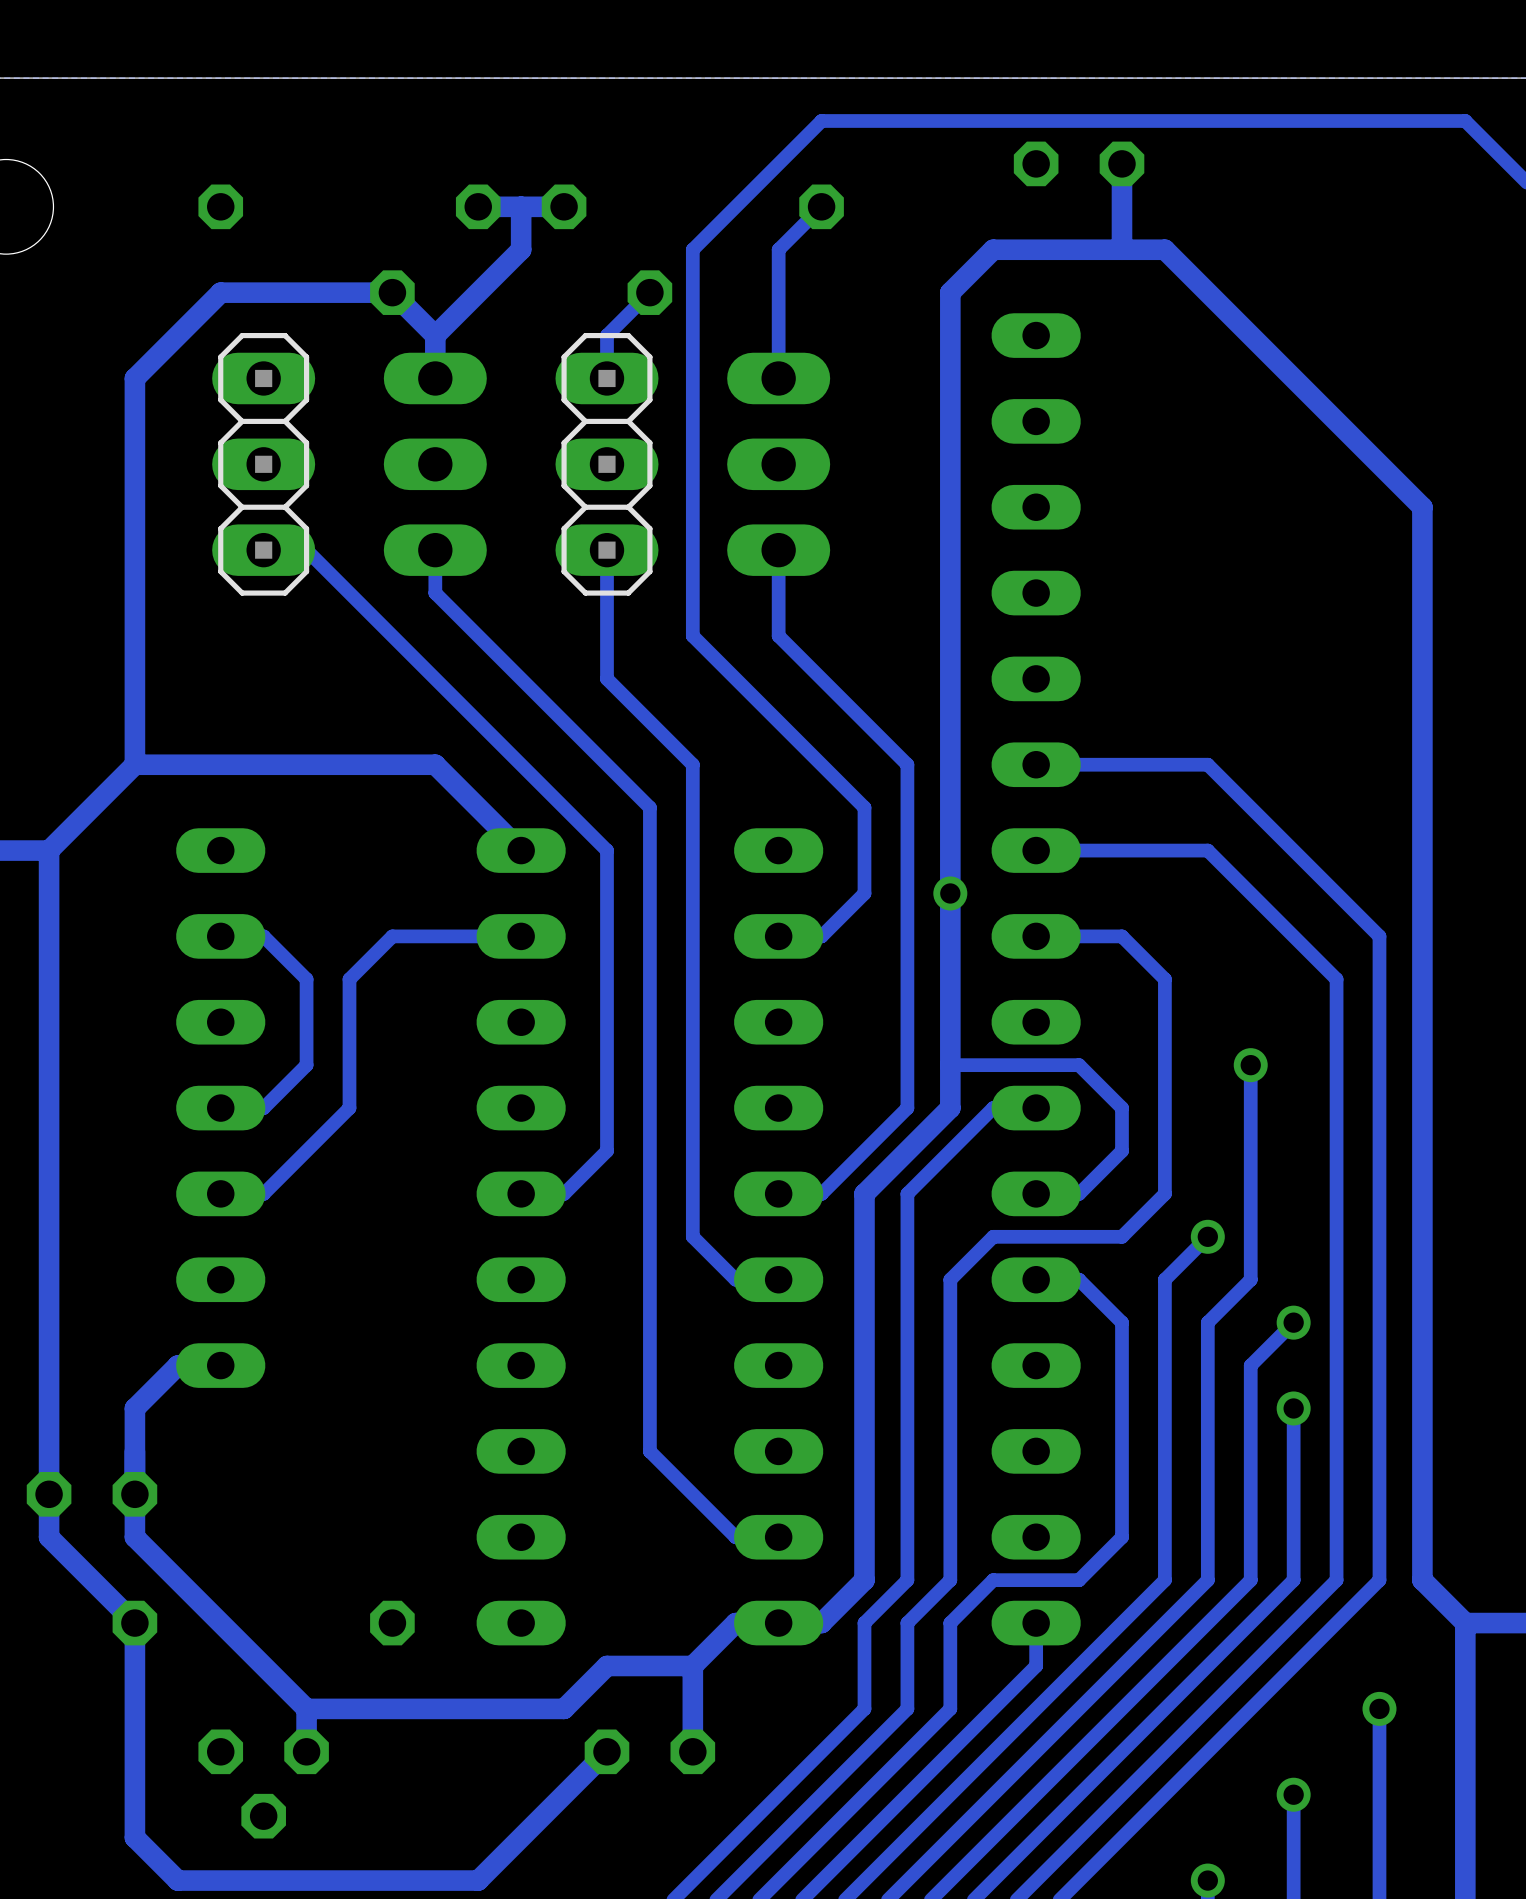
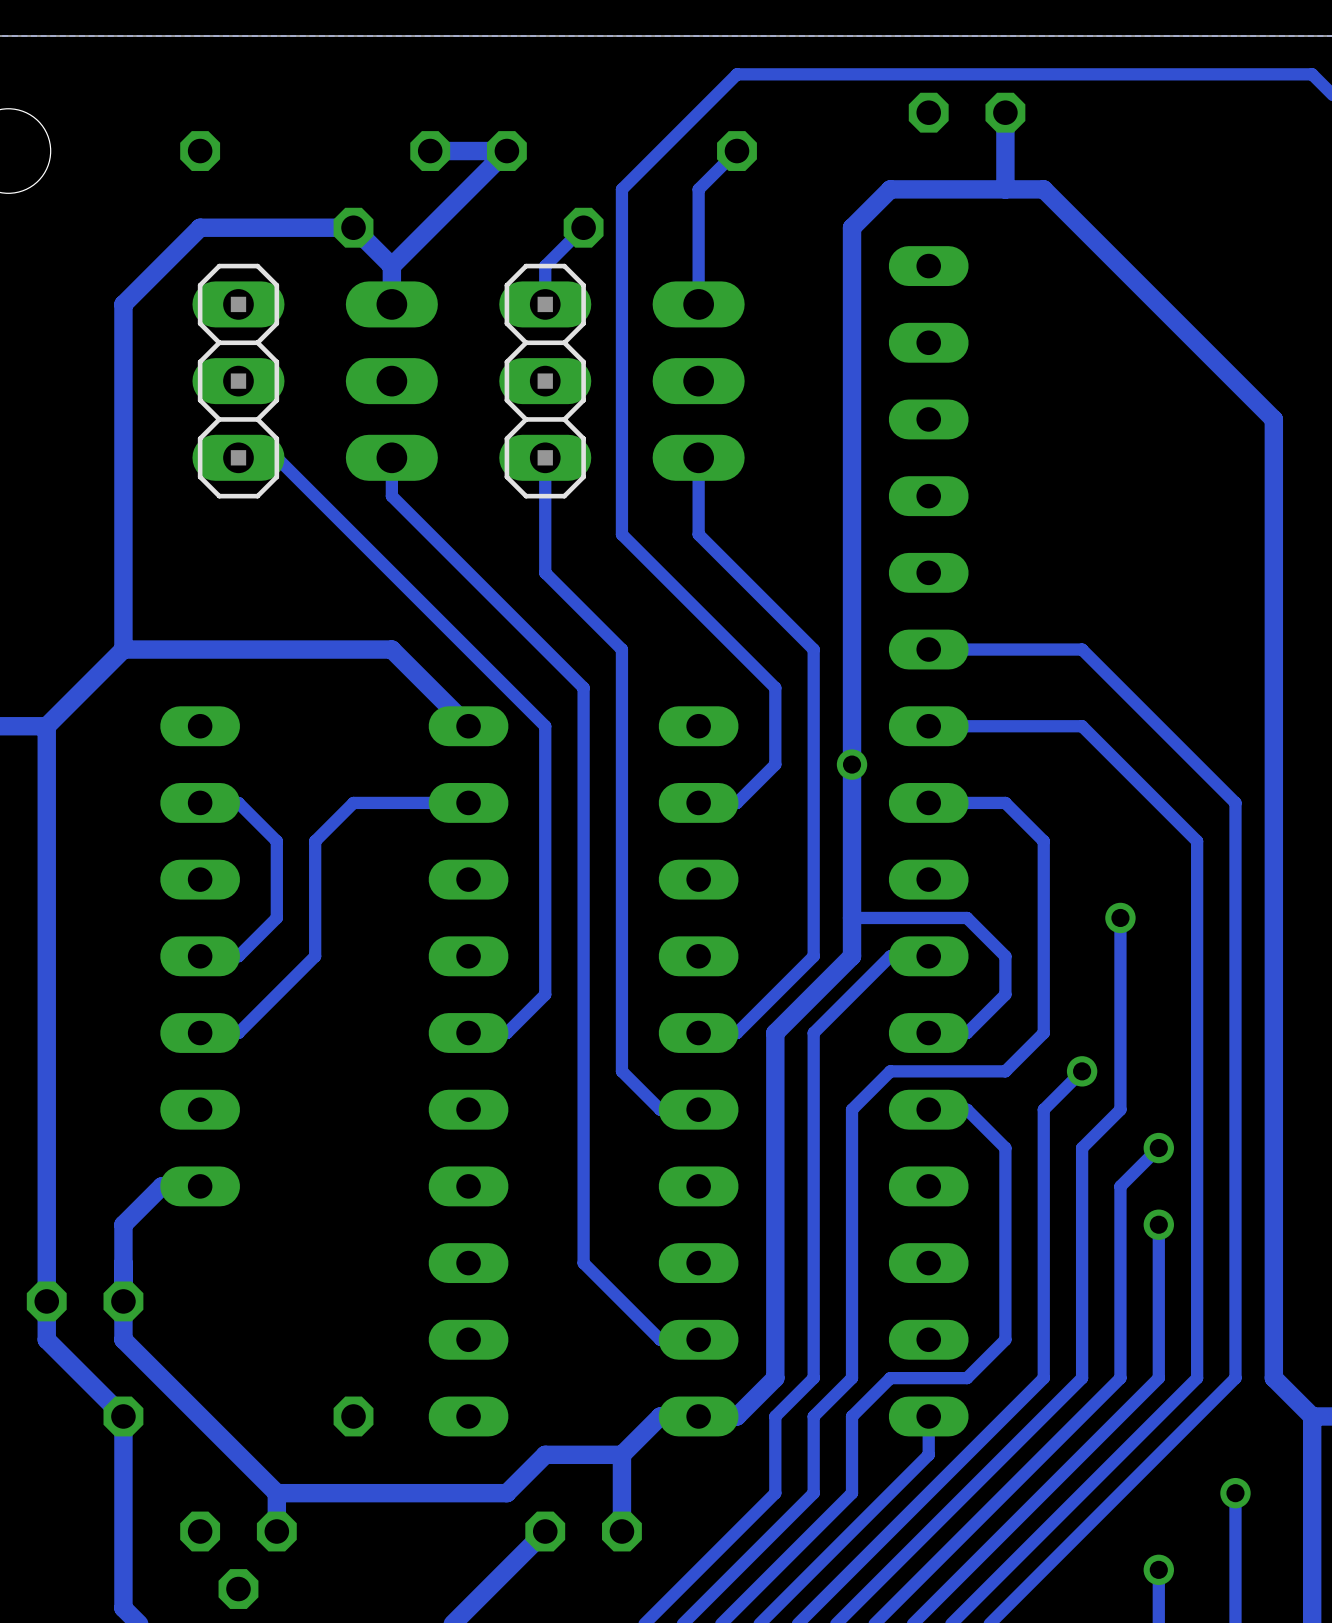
track: (521, 206) (521, 249) -> (506, 151) (468, 189)

